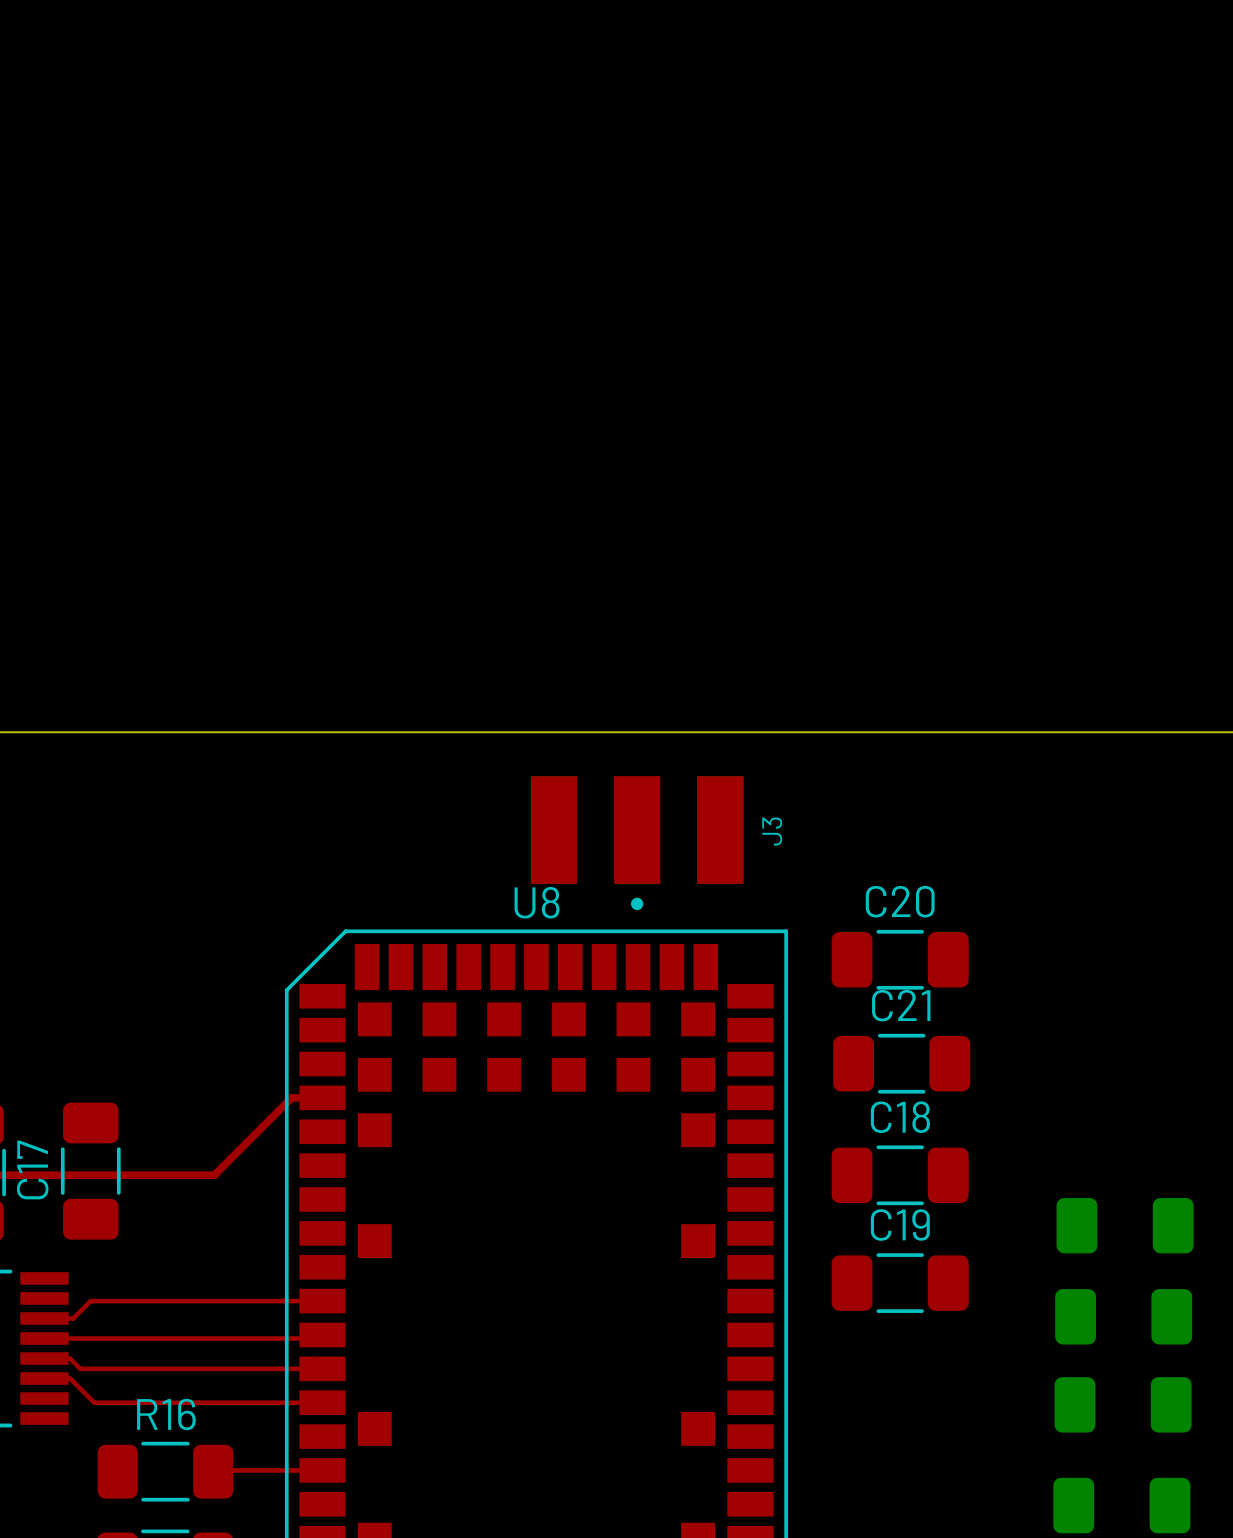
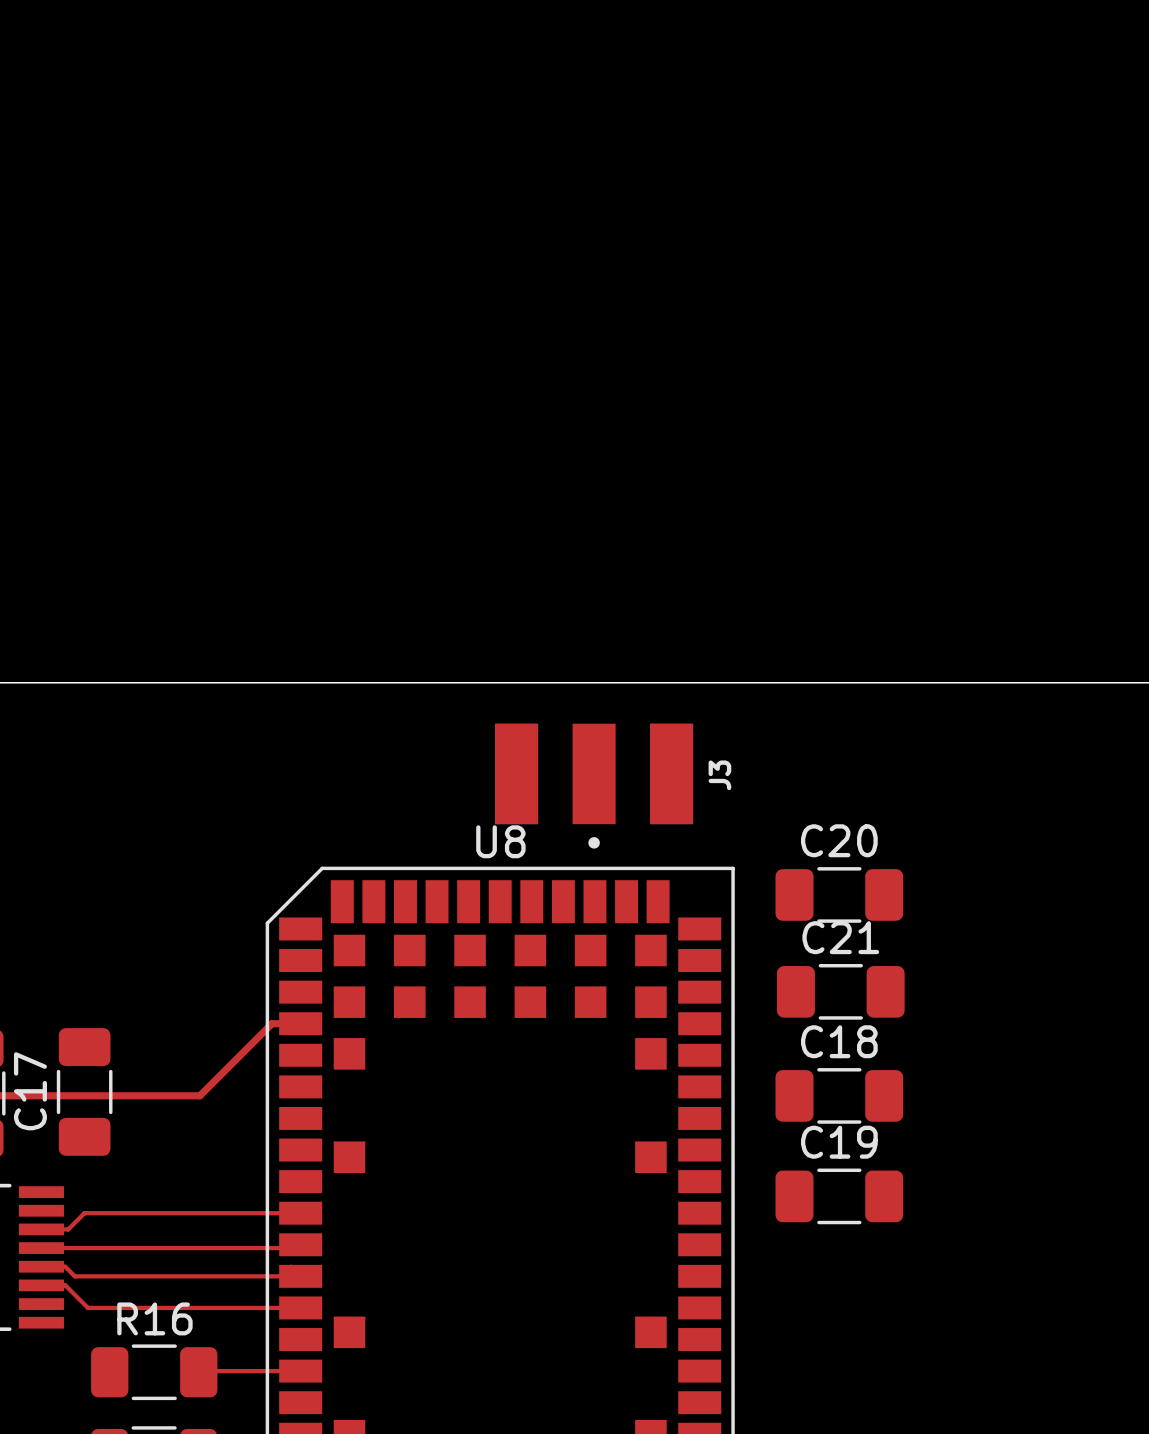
part: (1125, 1225) -> none
part: (1123, 1316) -> none
part: (1123, 1404) -> none
part: (1121, 1505) -> none

